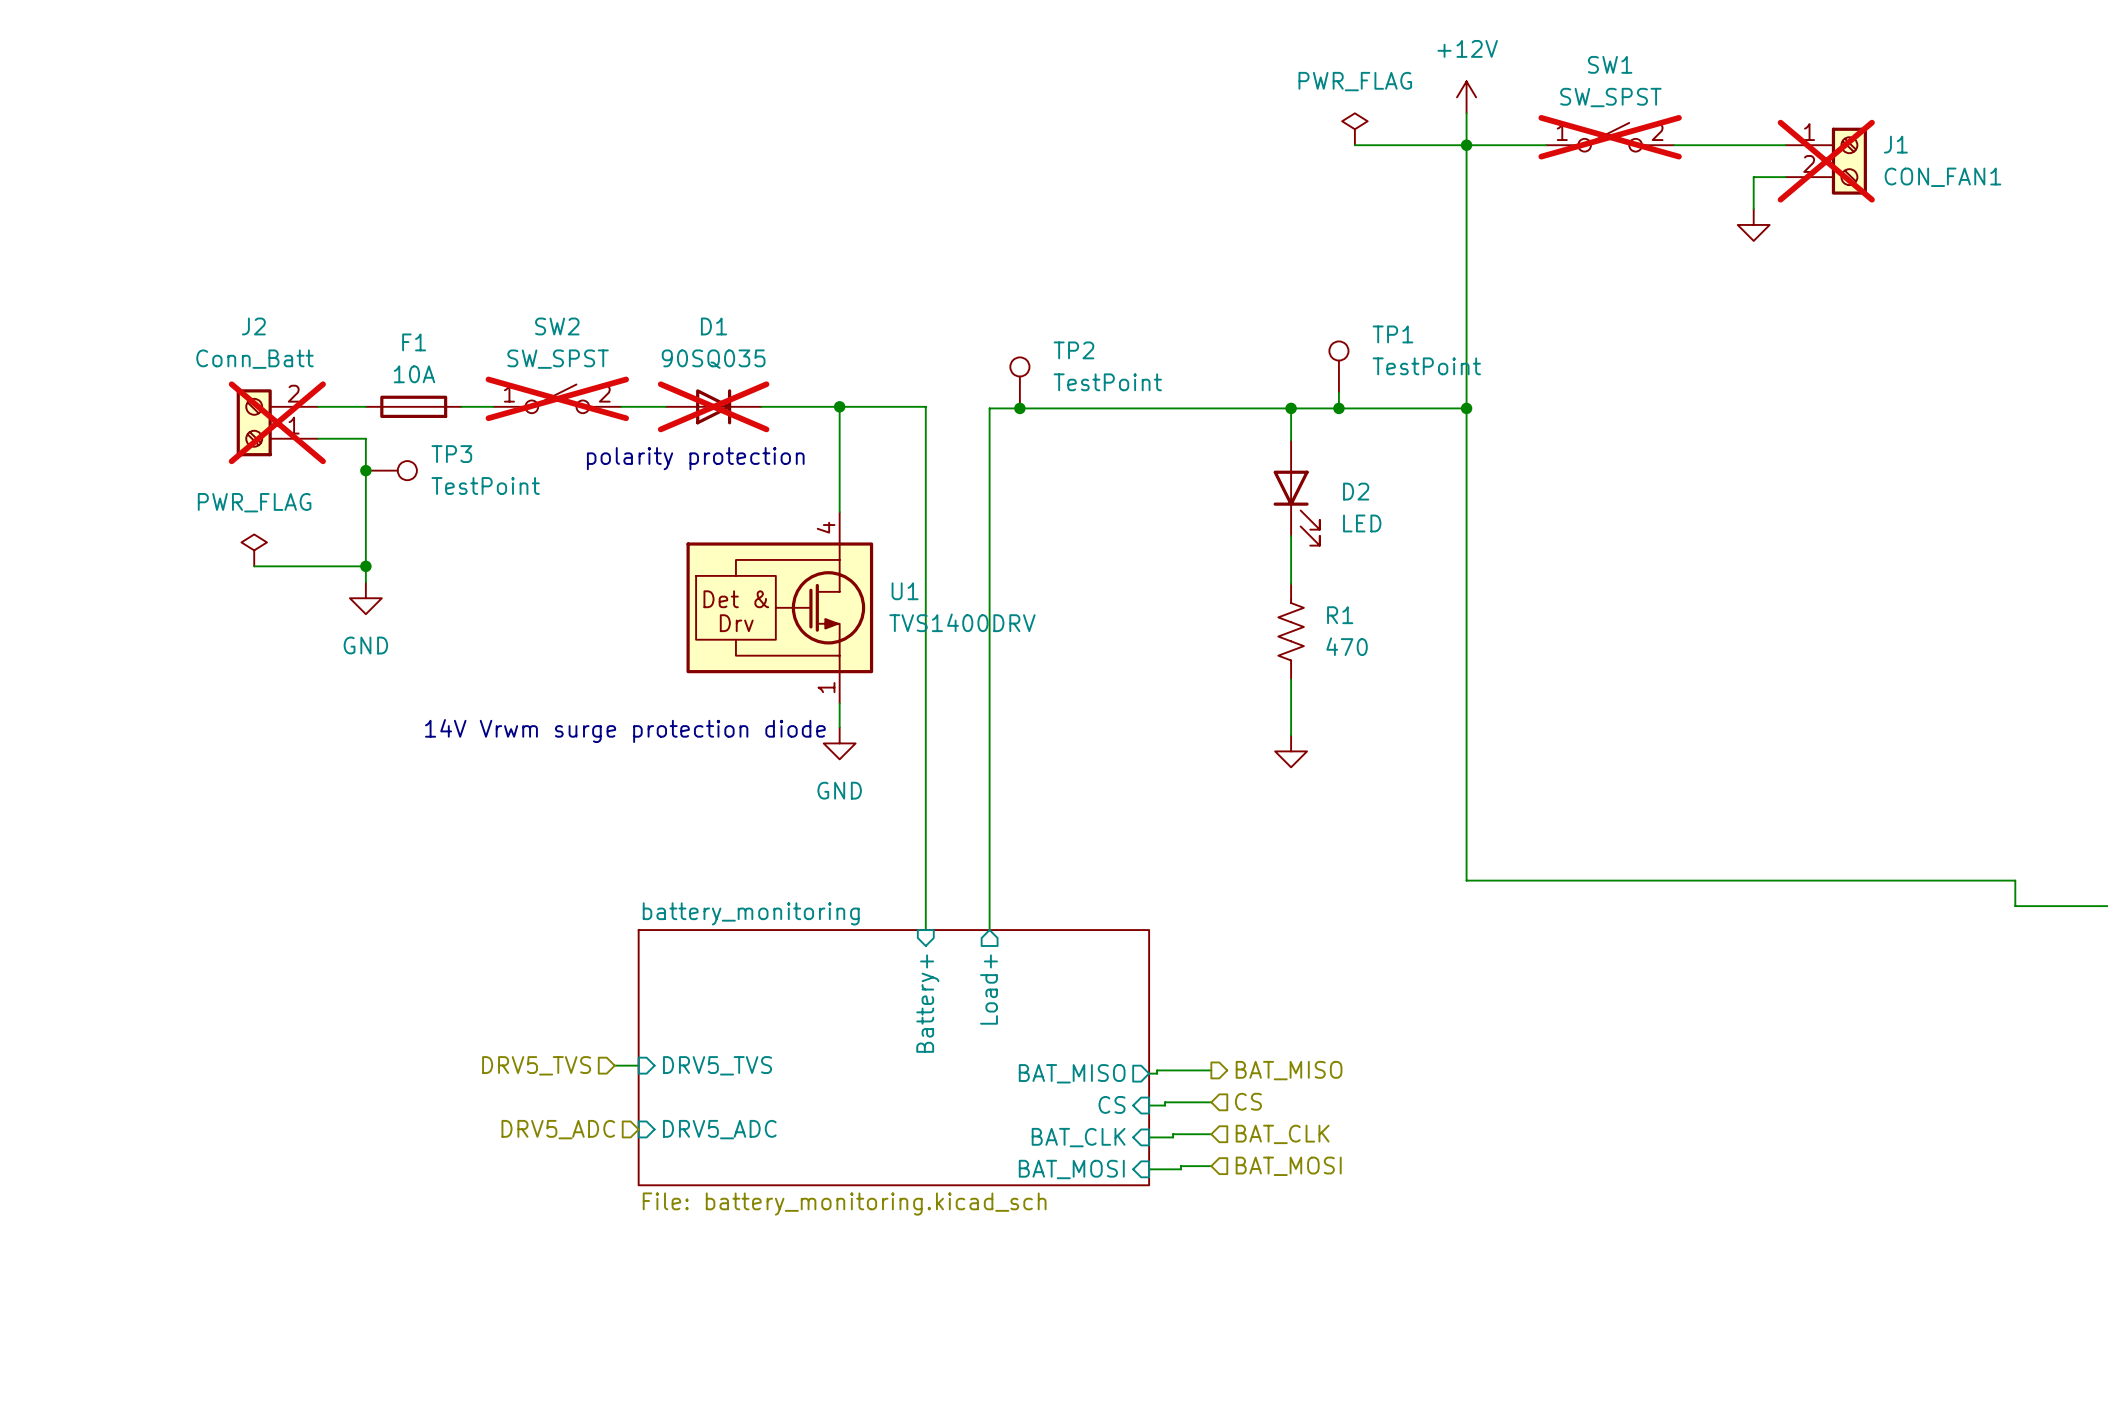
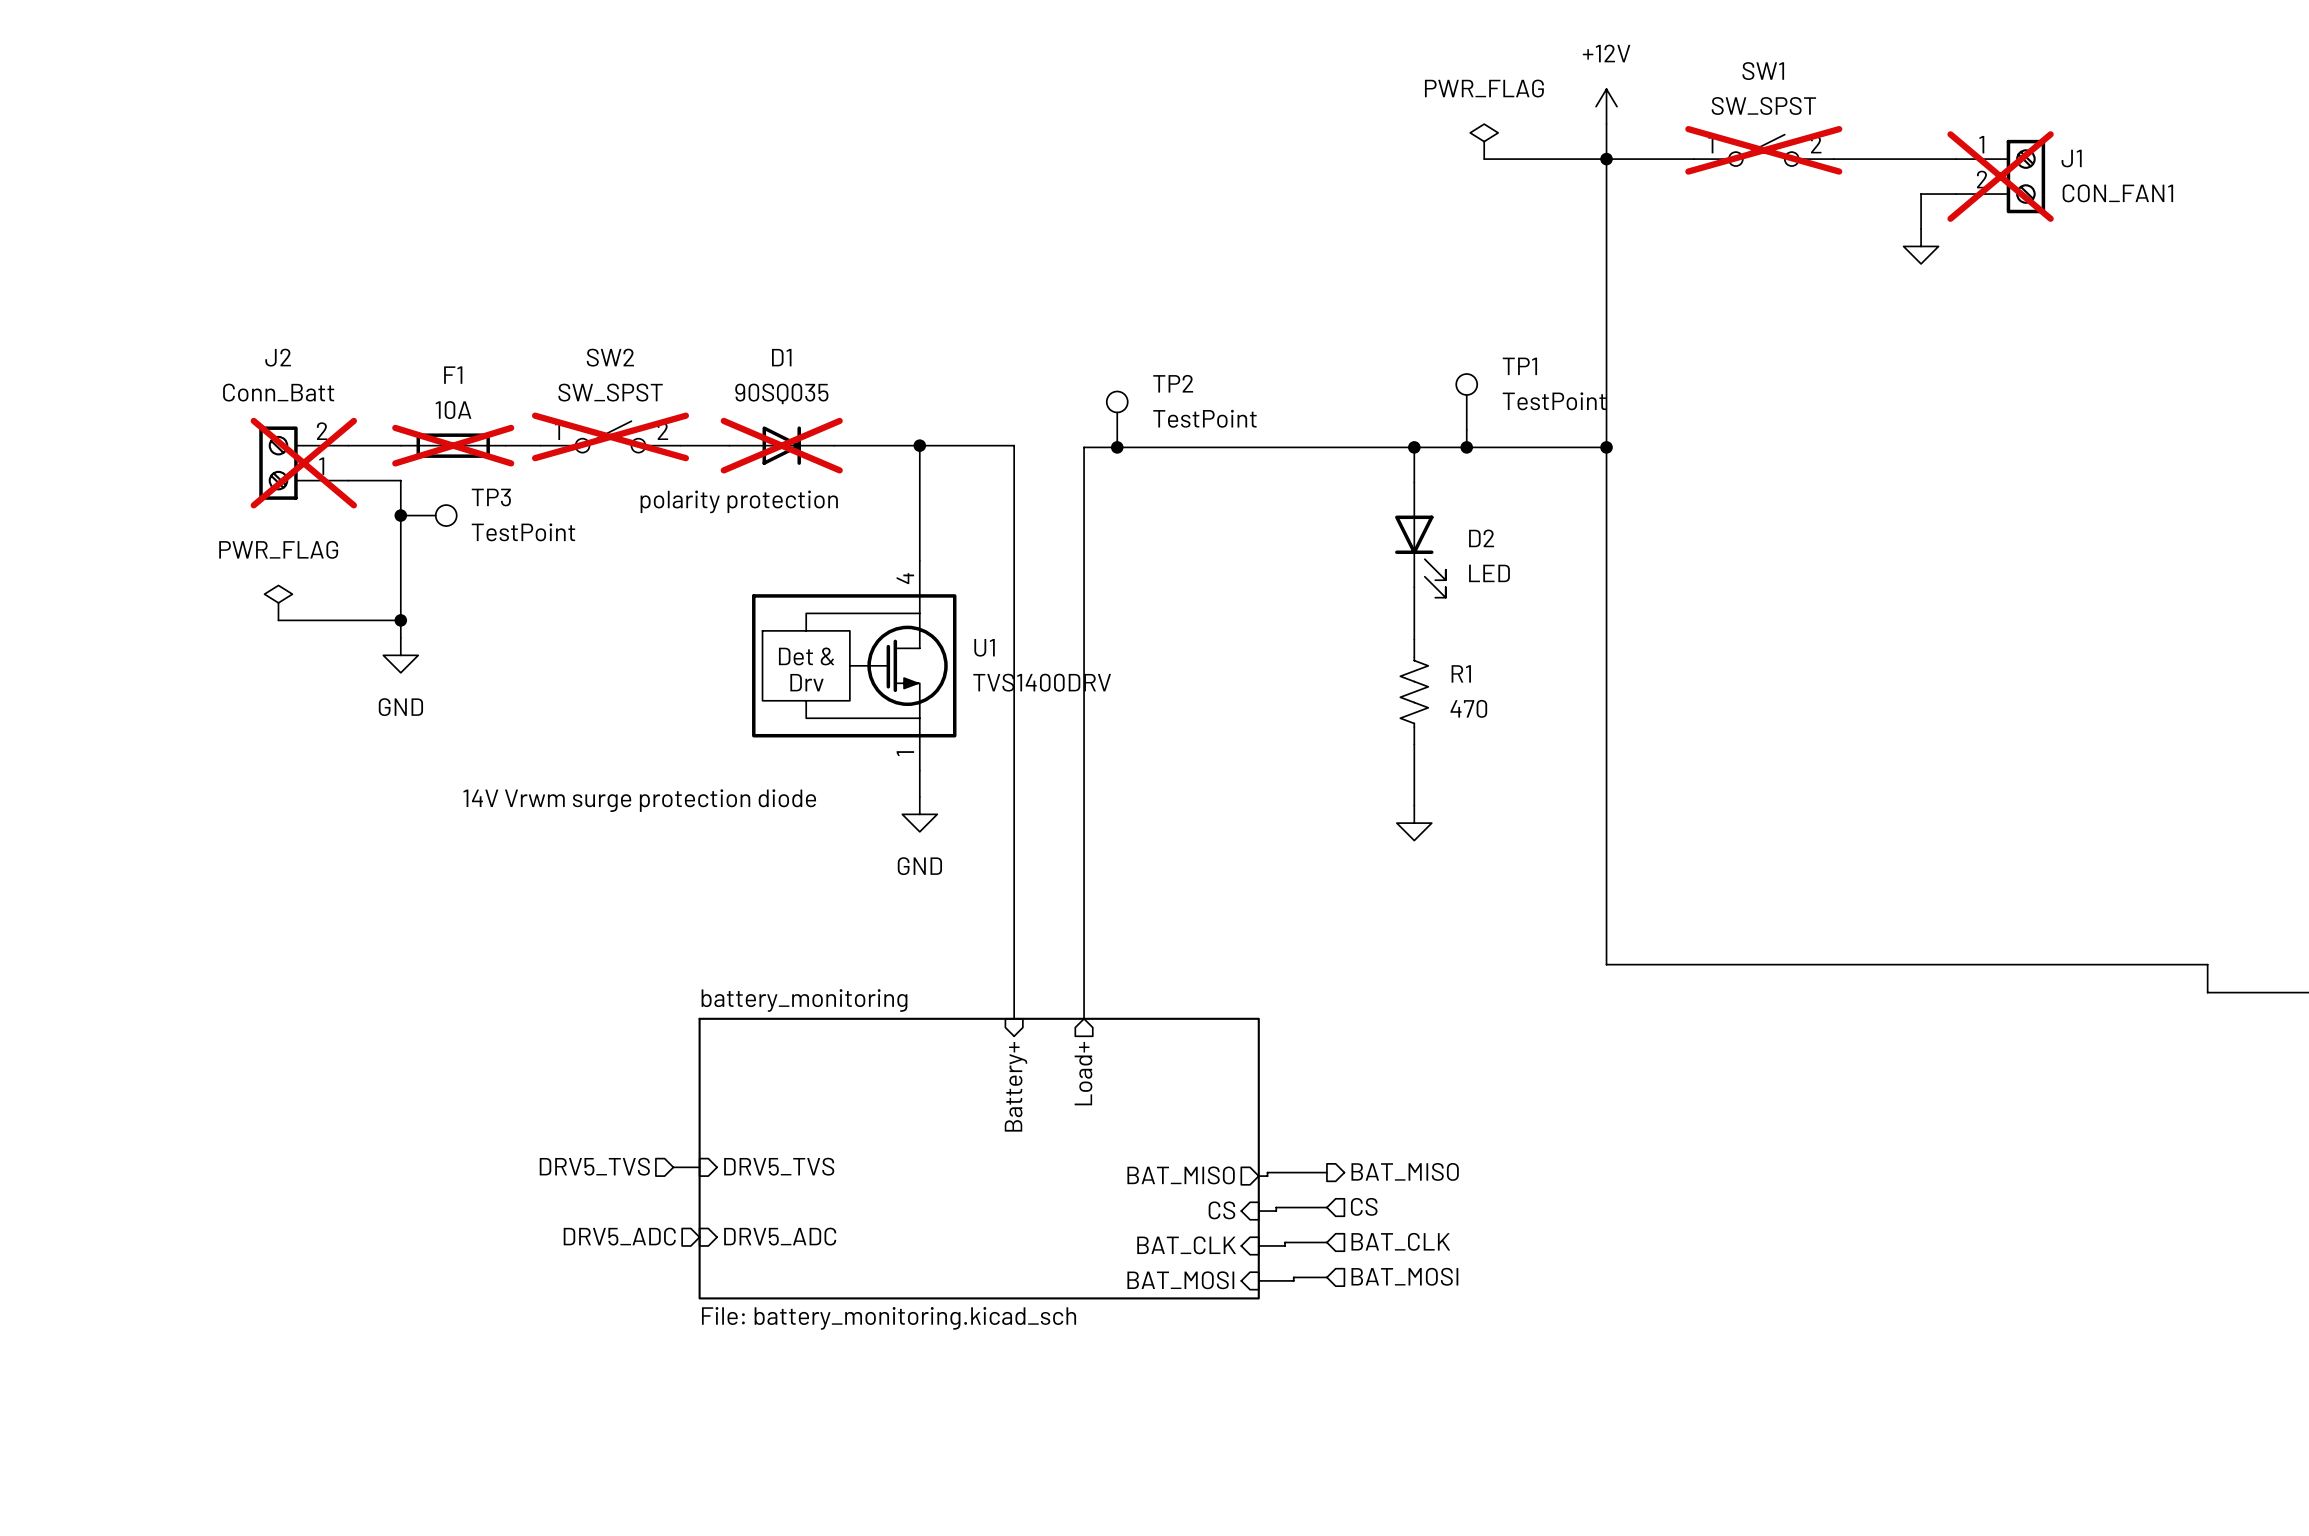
F1 do-not-place cross: none -> (453, 445)

